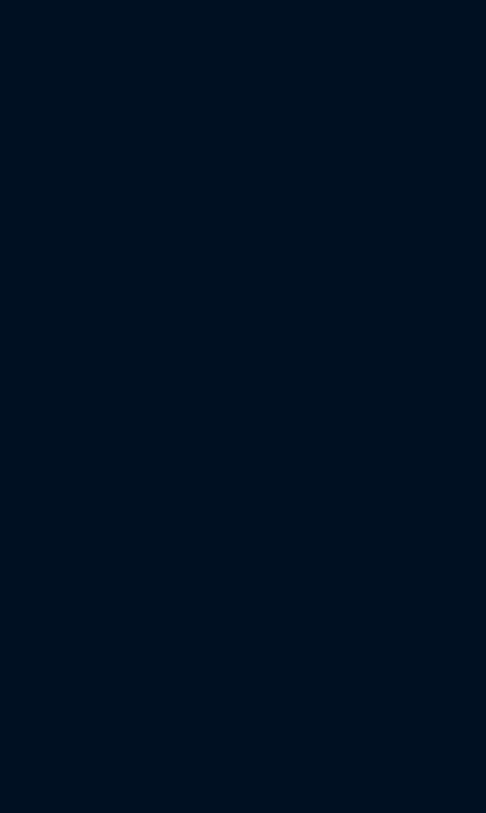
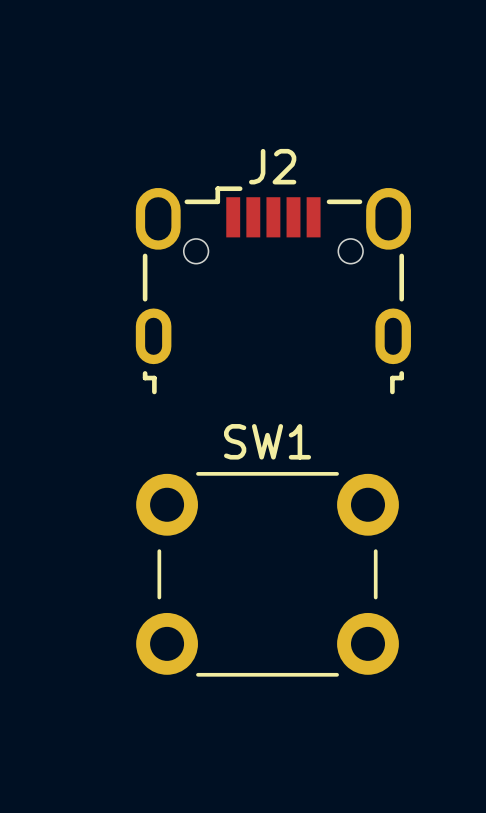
J2: none -> (273, 290)
SW1: none -> (267, 574)

